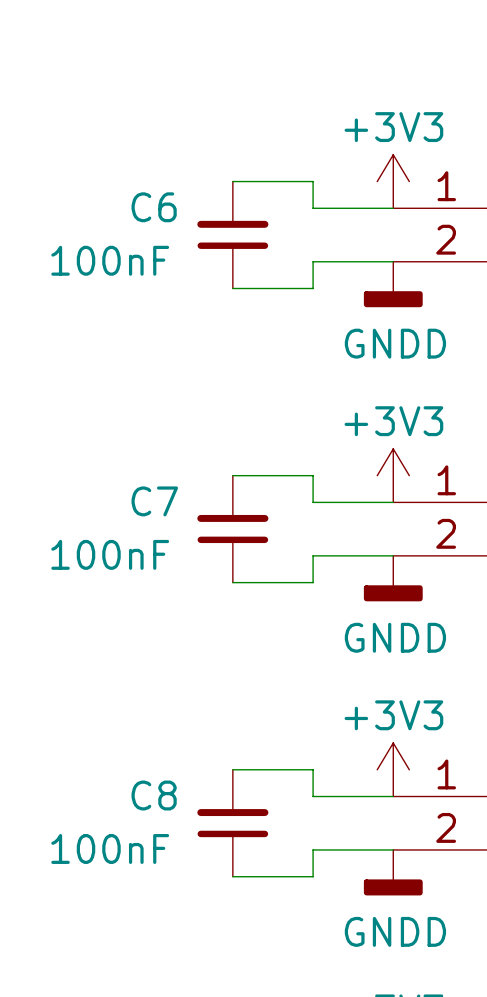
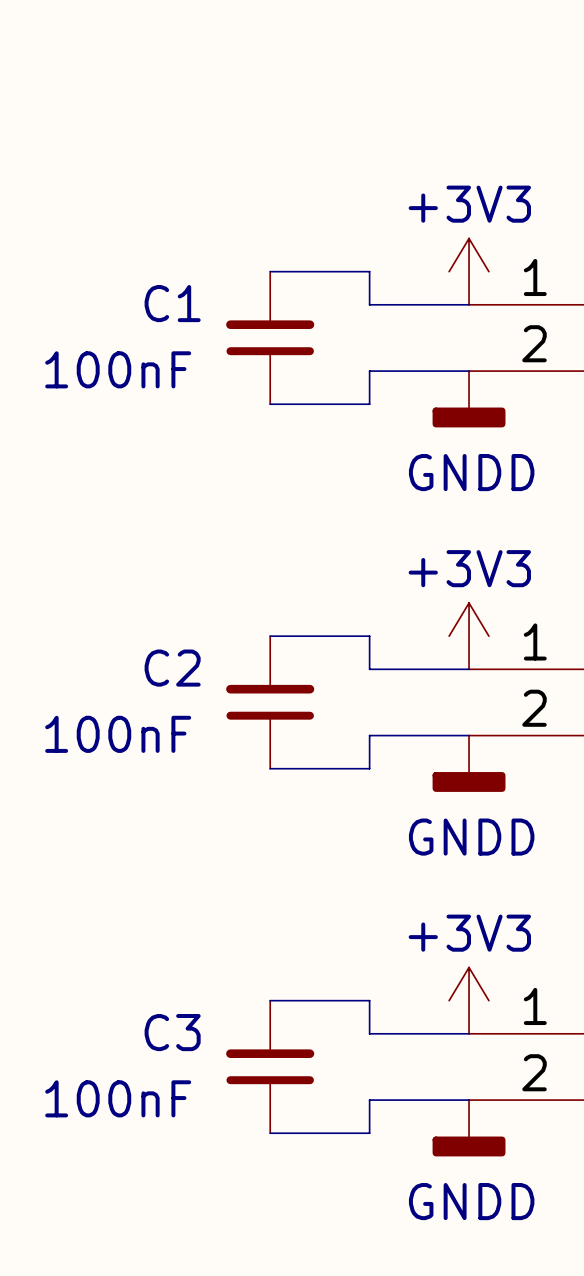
C6 name: C6 (154, 207) -> C1 (172, 303)
C7 name: C7 (154, 501) -> C2 (172, 668)
C8 name: C8 (154, 795) -> C3 (172, 1032)

